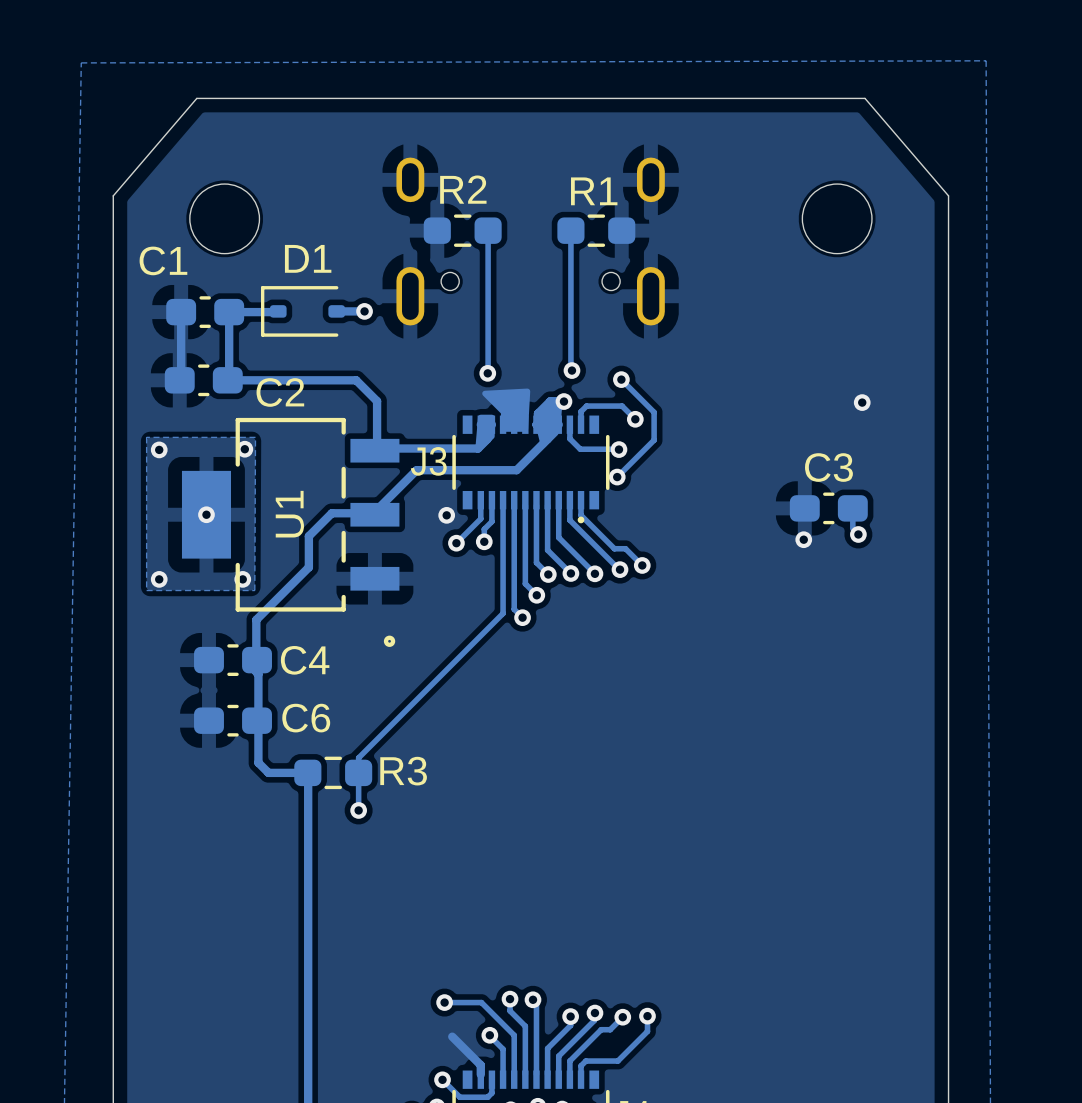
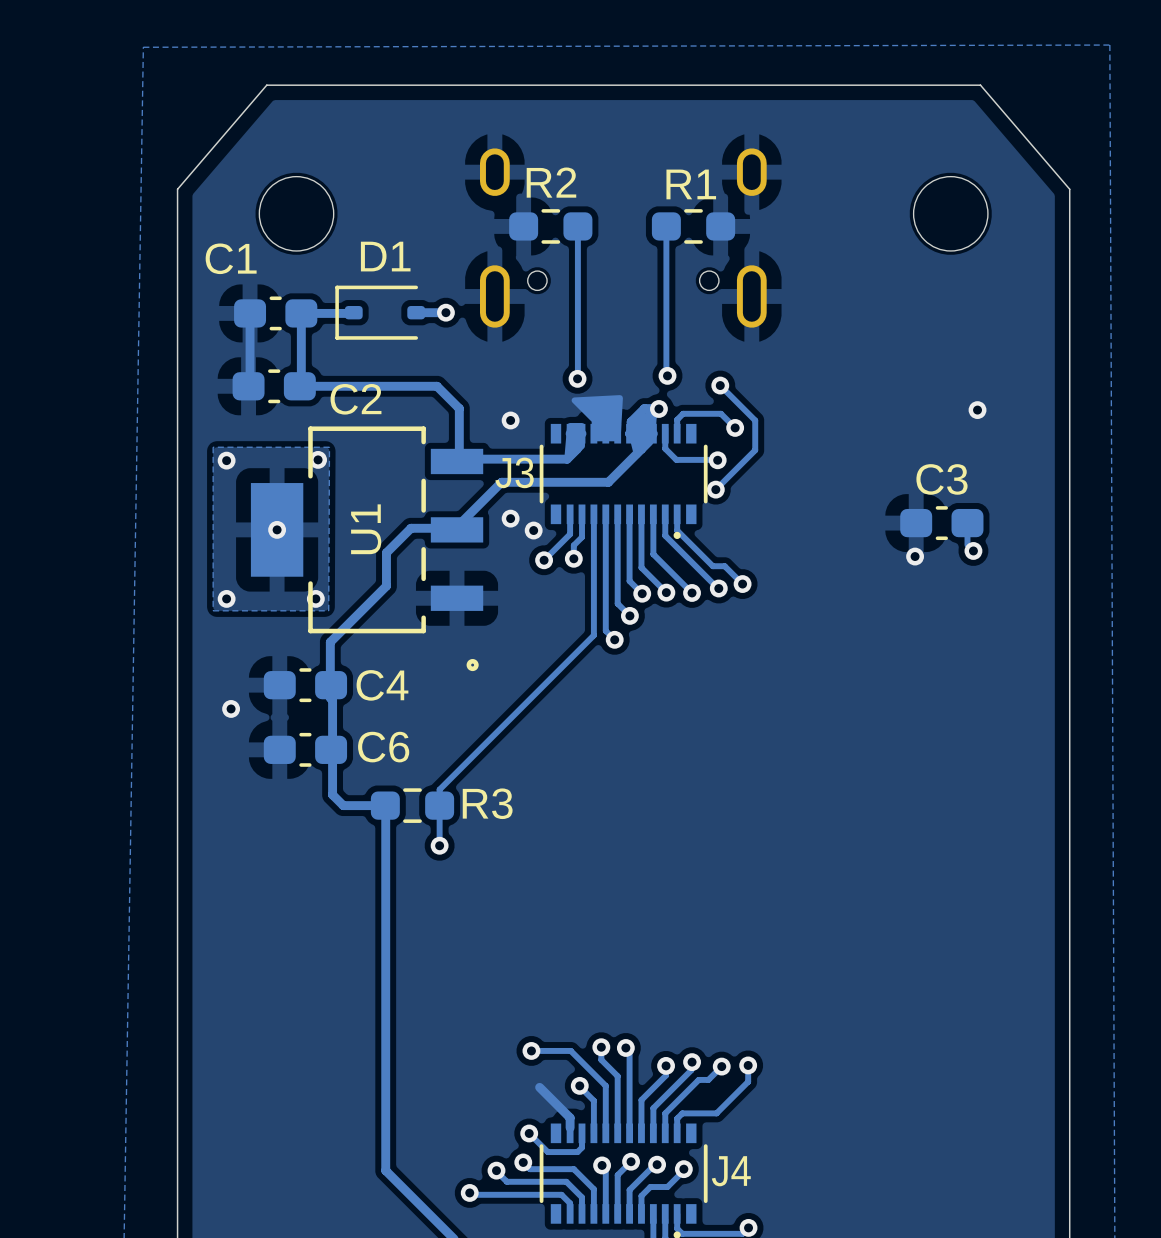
via: none -> (510, 420)
via: none -> (510, 518)
via: none -> (231, 708)

